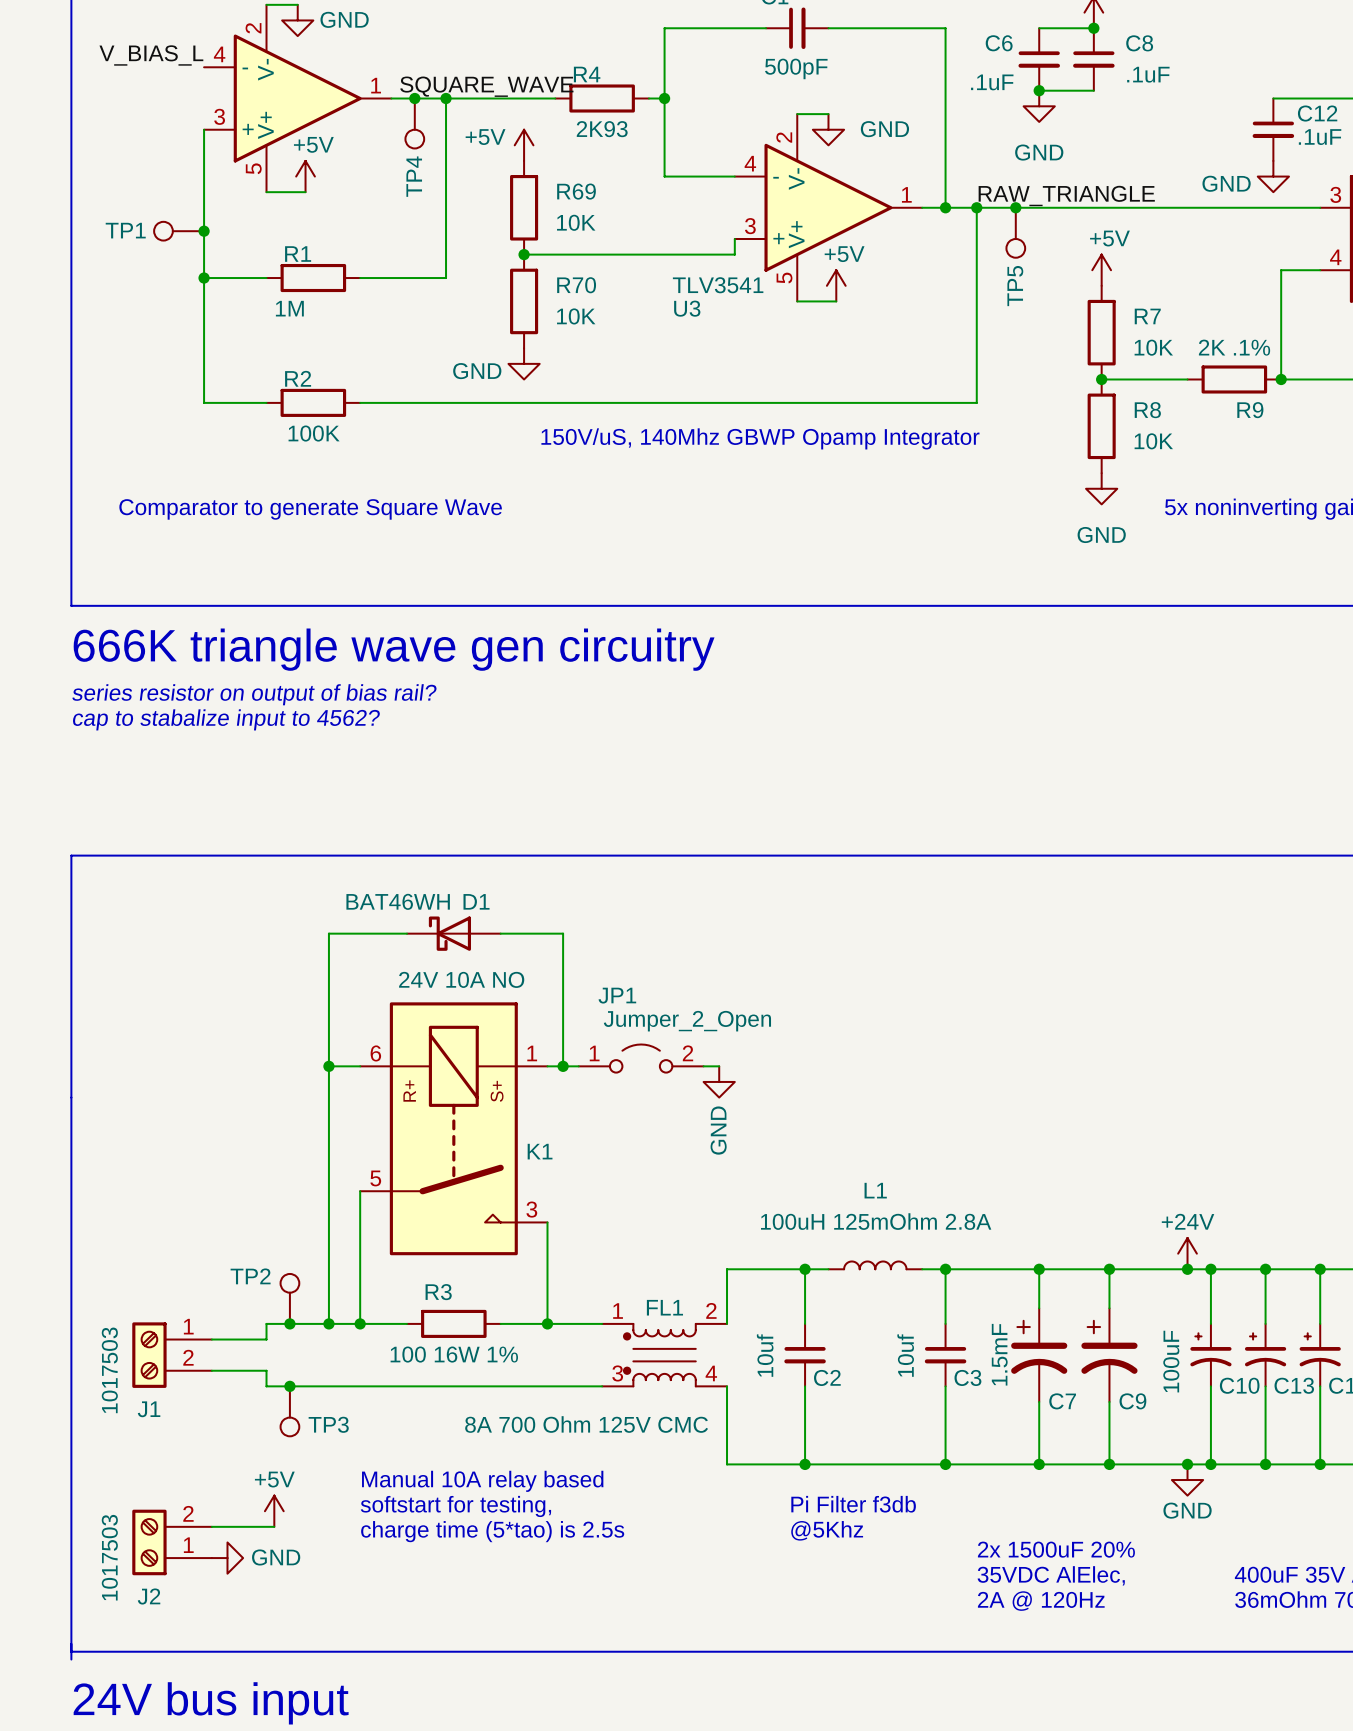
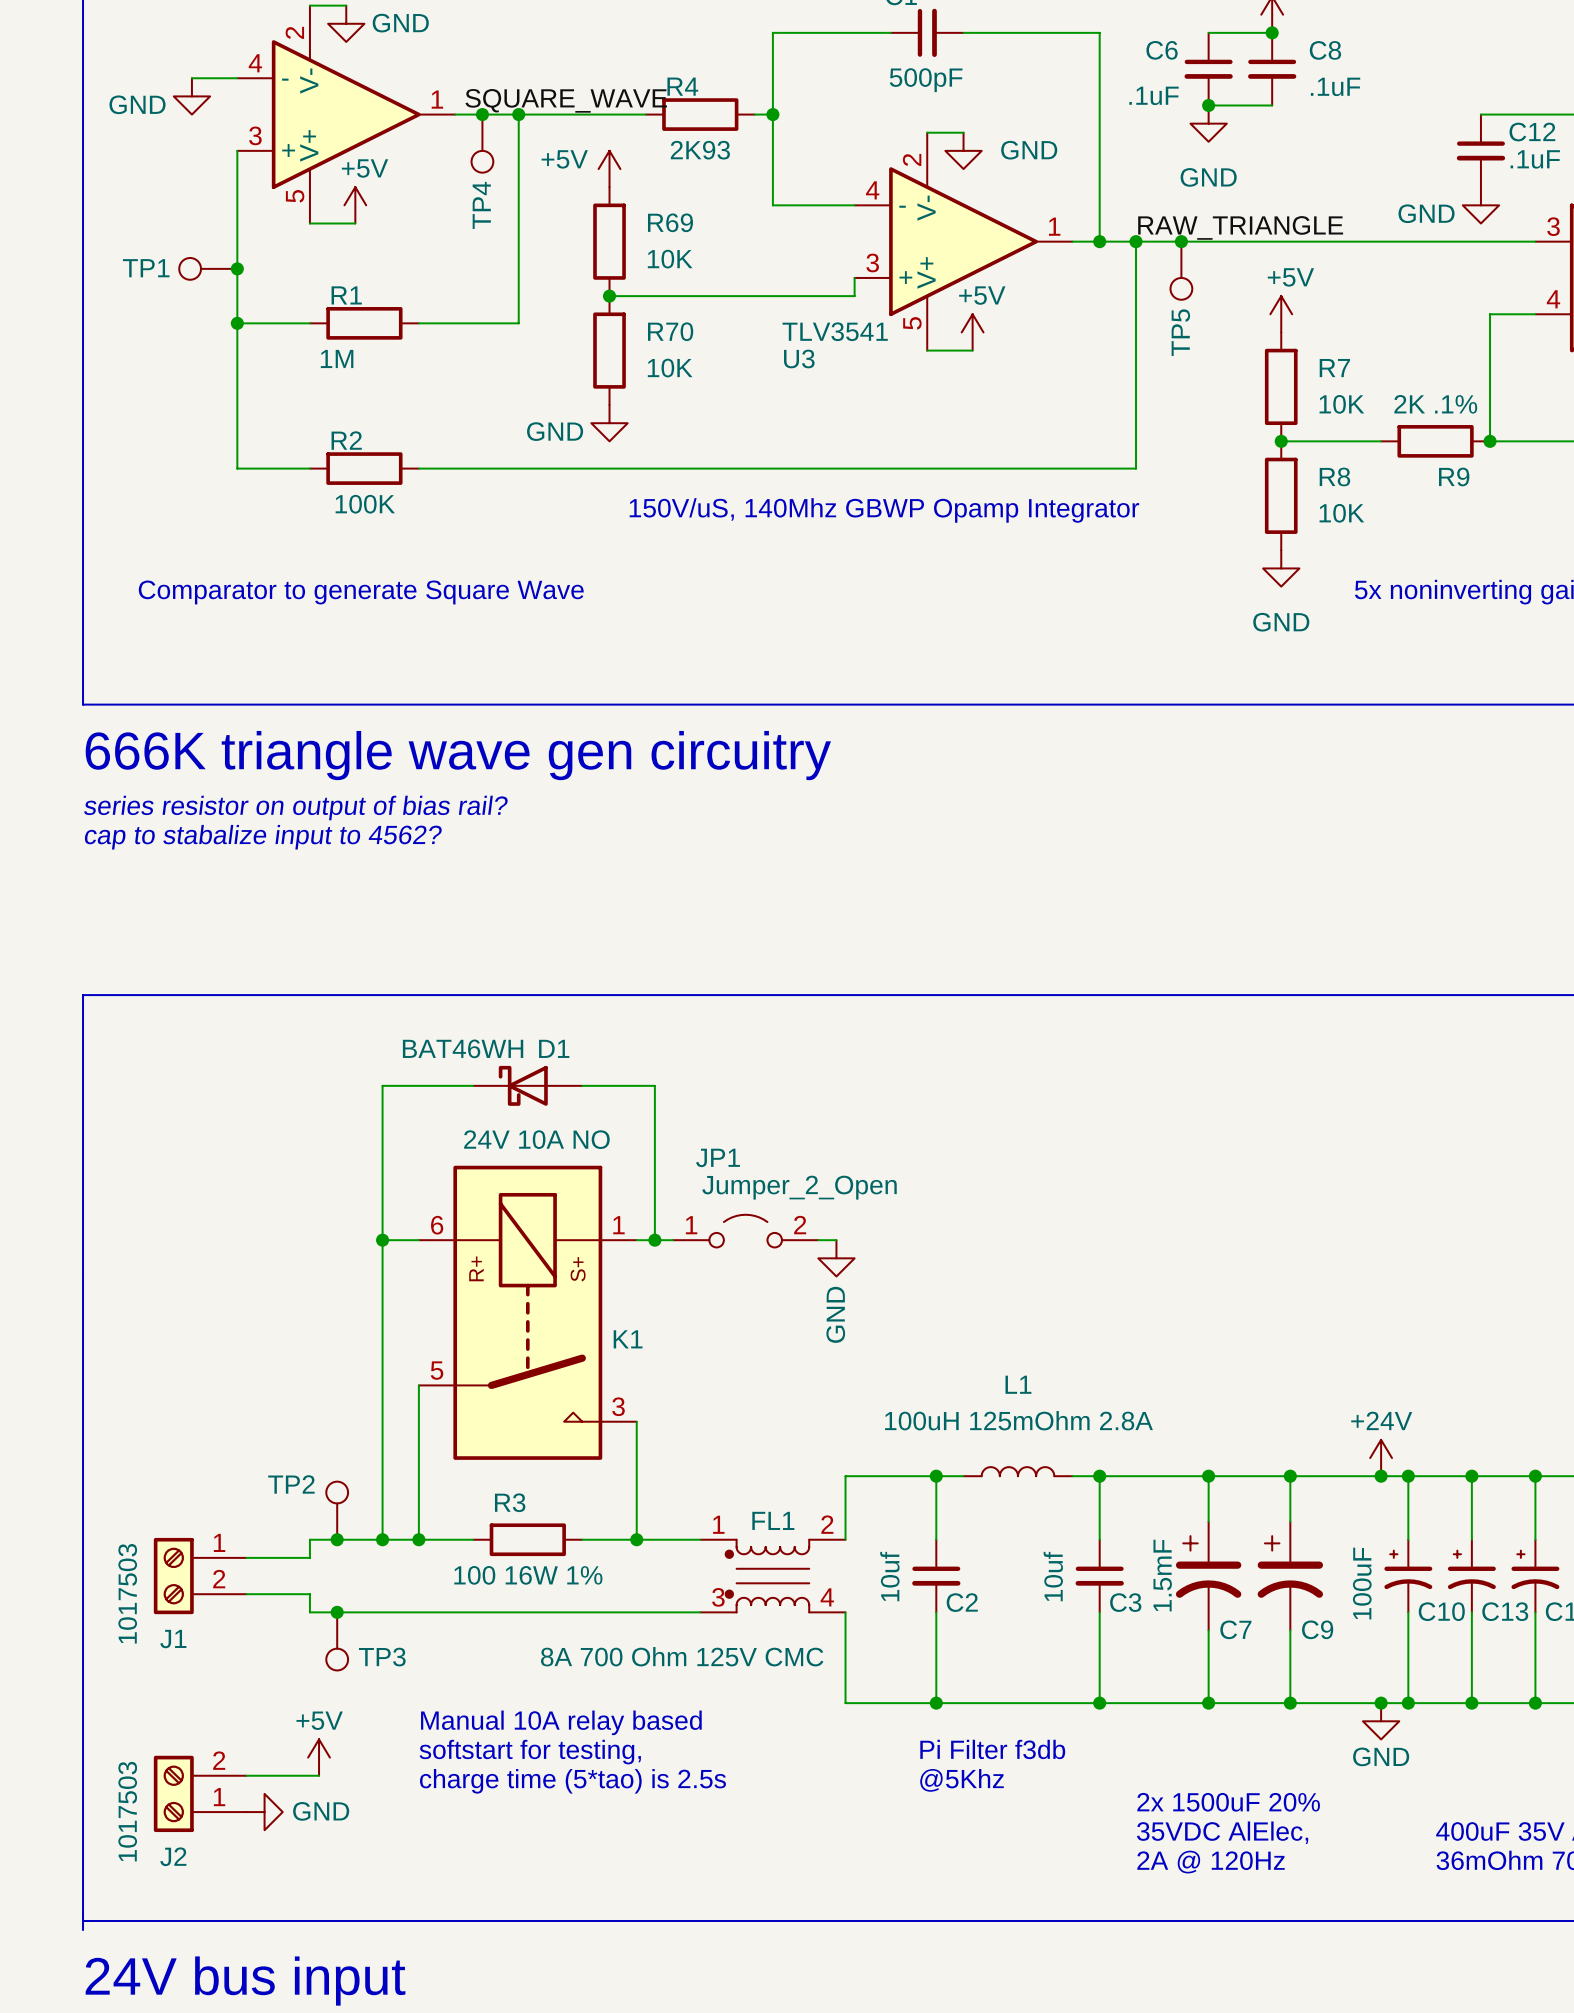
label: V_BIAS_L (151, 55) -> none
wire: none -> (191, 78) (237, 78)
power symbol: none -> GND (191, 96)

